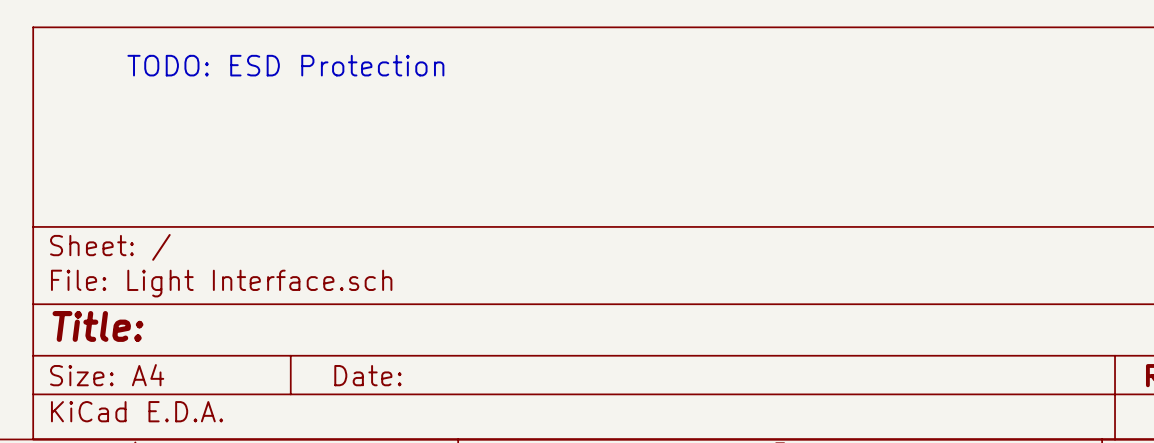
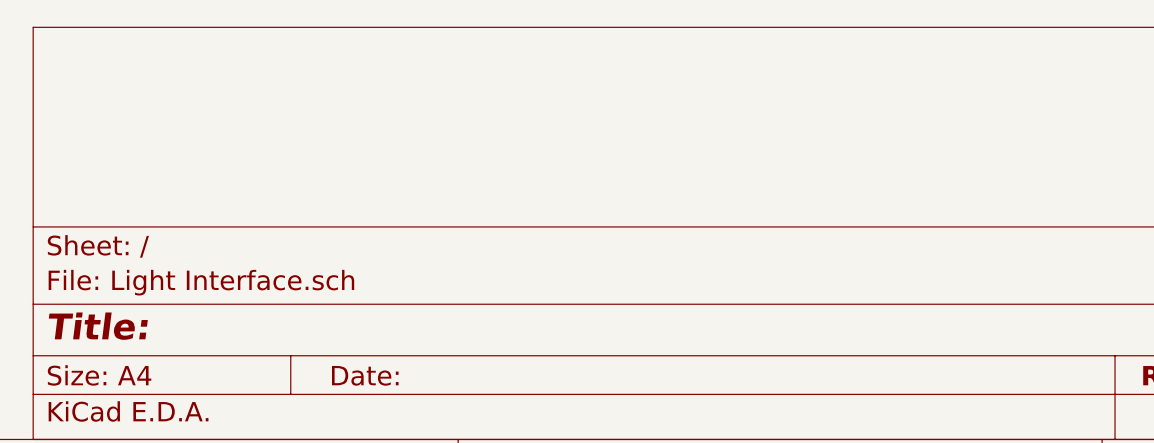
text: TODO: ESD Protection (285, 65) -> none

